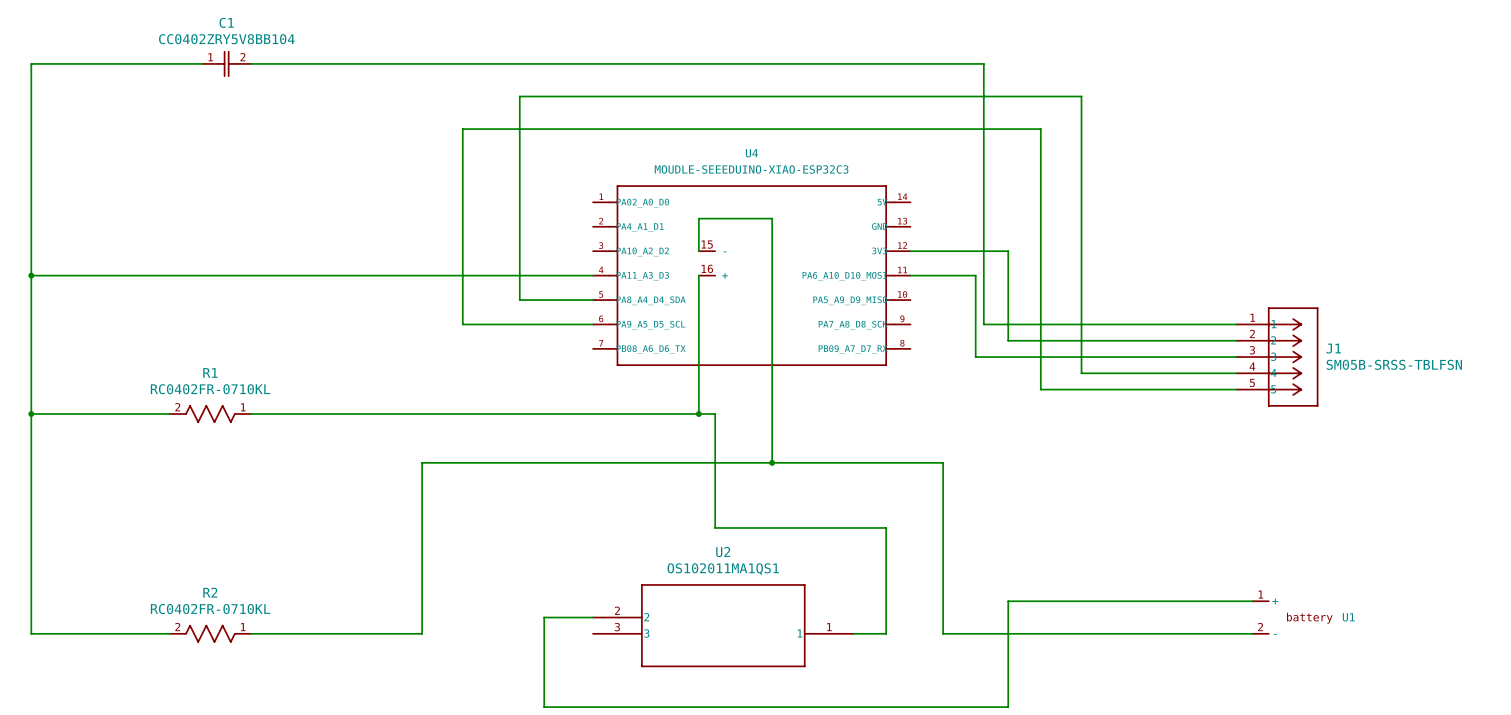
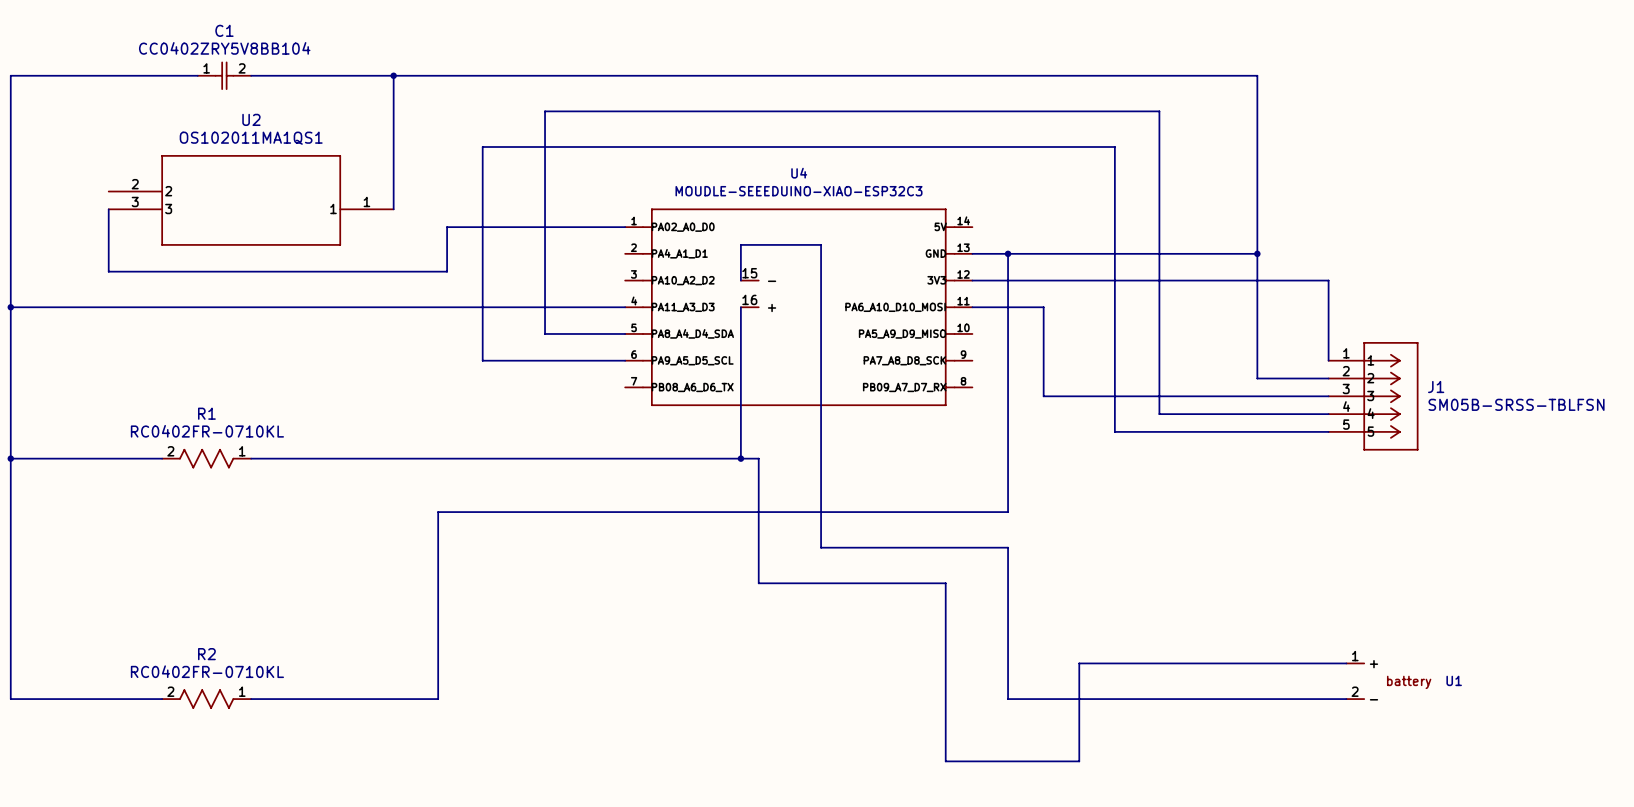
wire: none -> (393, 75) (393, 209)
junction: none -> (393, 75)
wire: (983, 63) (983, 324) (1236, 324) -> (1052, 75) (1257, 75) (1257, 378)
wire: none -> (108, 209) (108, 271) (447, 271) (447, 227) (625, 227)
wire: none -> (972, 253) (1257, 253)
wire: none -> (1008, 253) (1008, 512)
junction: none -> (1008, 253)
junction: none -> (1257, 253)
wire: (1008, 251) (1008, 340) (1171, 340) -> (1079, 280) (1328, 280) (1328, 360)
junction: (772, 462) -> none
wire: (943, 462) (943, 495) -> (821, 512) (821, 547) (1008, 547)
wire: (593, 617) (544, 617) (544, 707) (1008, 707) (1008, 690) -> none
U2 position: (723, 625) -> (251, 200)
wire: (853, 633) (886, 633) -> (1079, 761) (945, 761) (945, 699)

